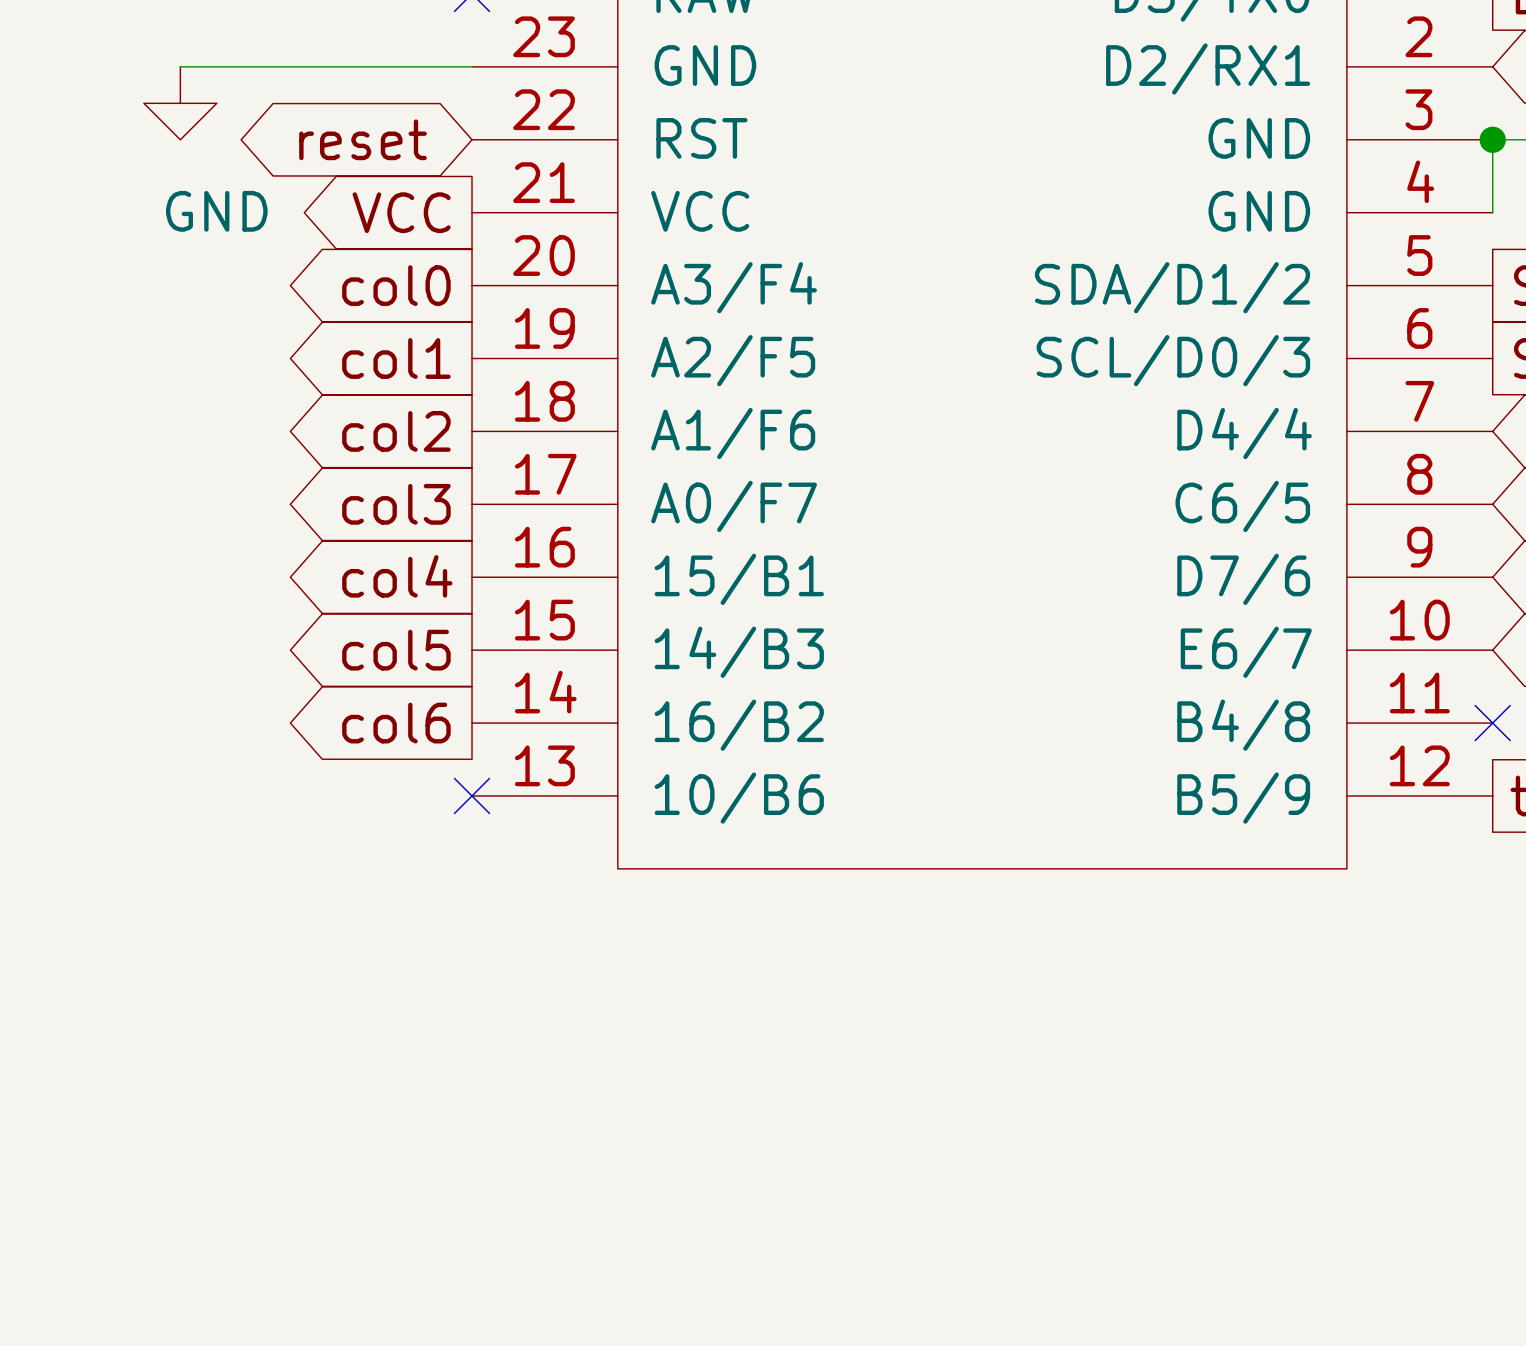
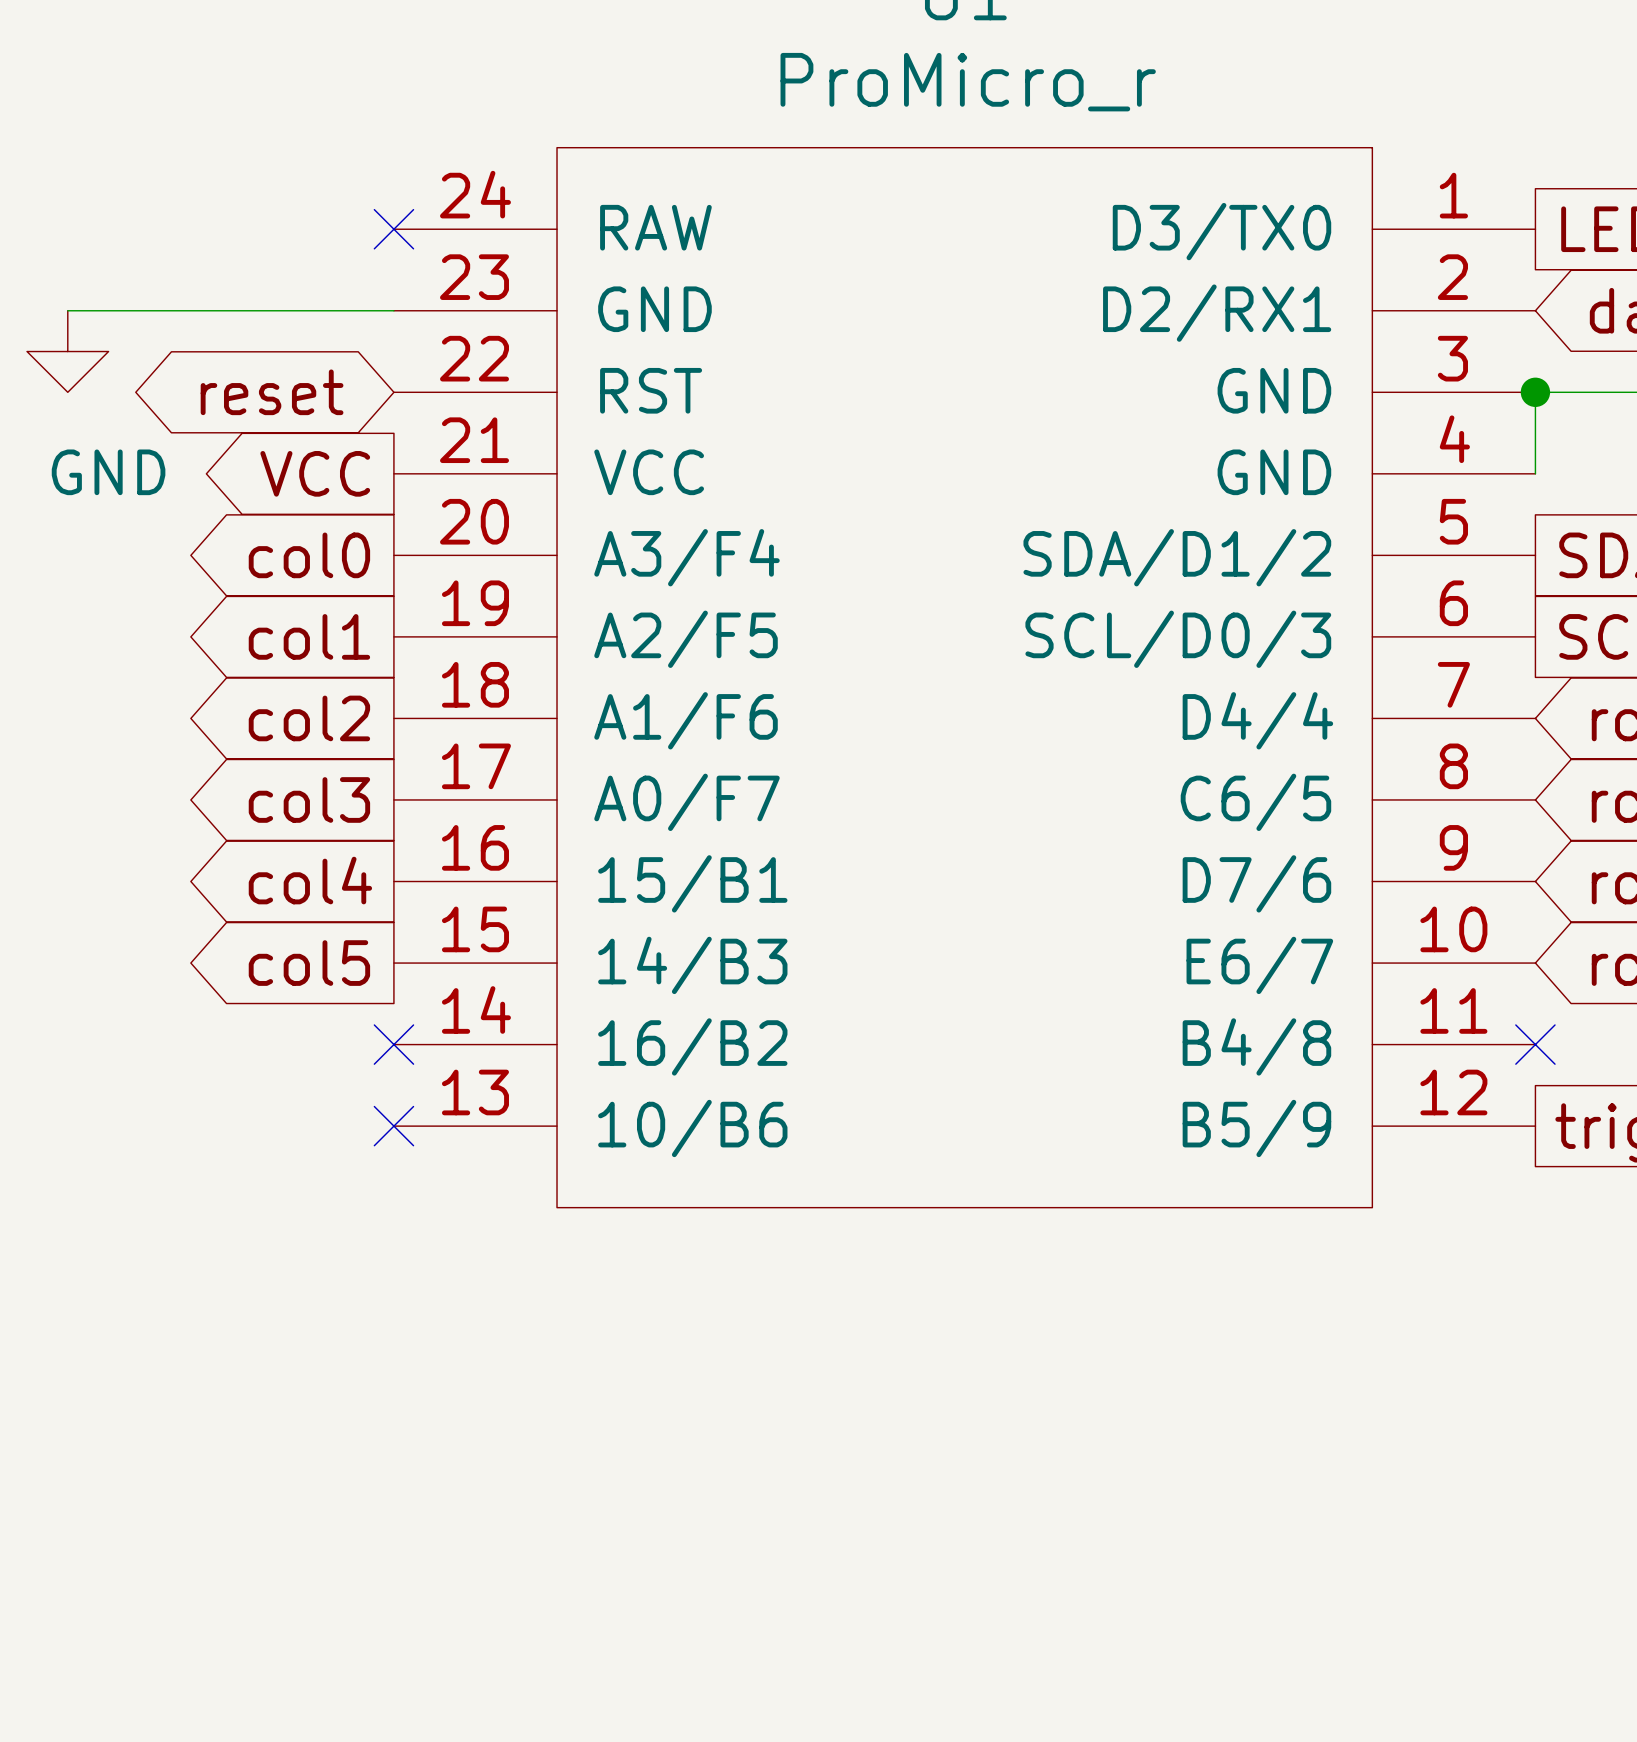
global label: col6 (396, 723) -> none
no-connect mark: none -> (393, 1044)

